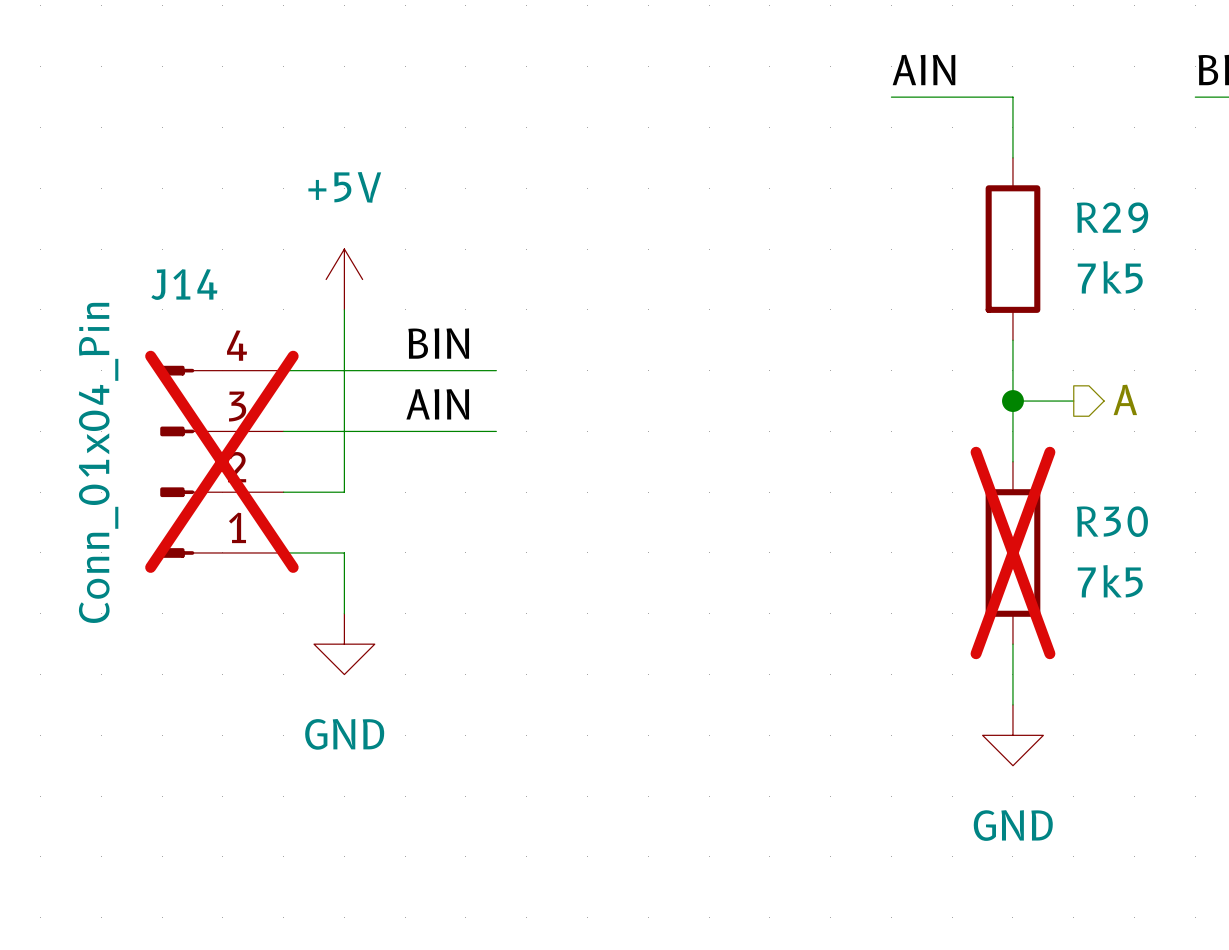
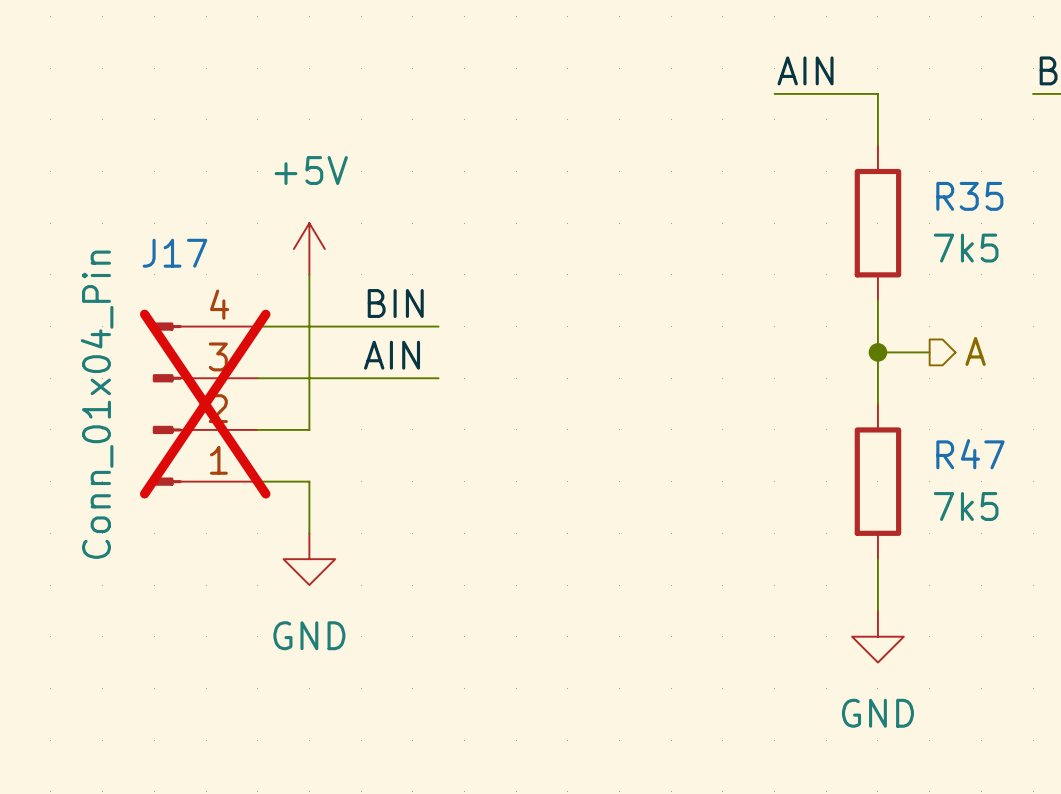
R29 name: R29 (1112, 217) -> R35 (969, 196)
J14 name: J14 (184, 284) -> J17 (174, 253)
R30 name: R30 (1112, 521) -> R47 (970, 454)
R30 do-not-place cross: (1012, 552) -> none

